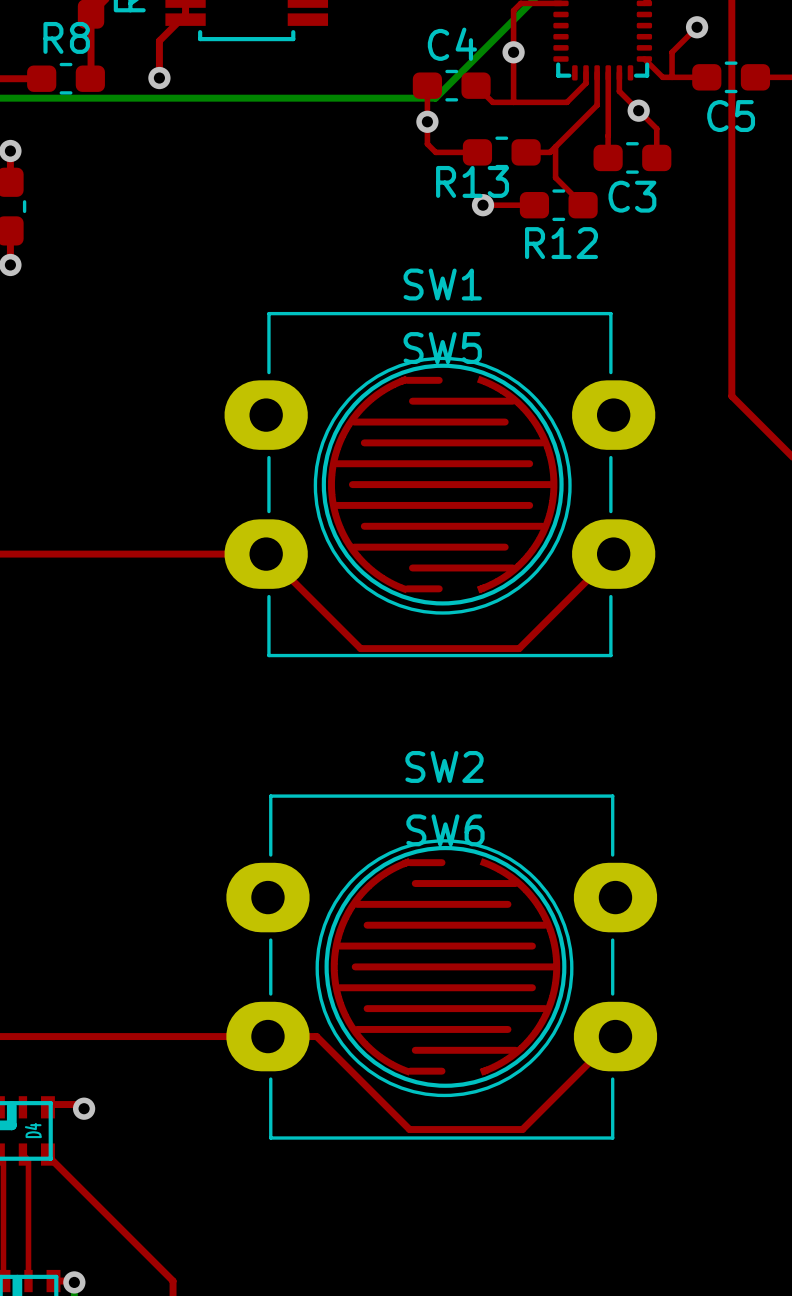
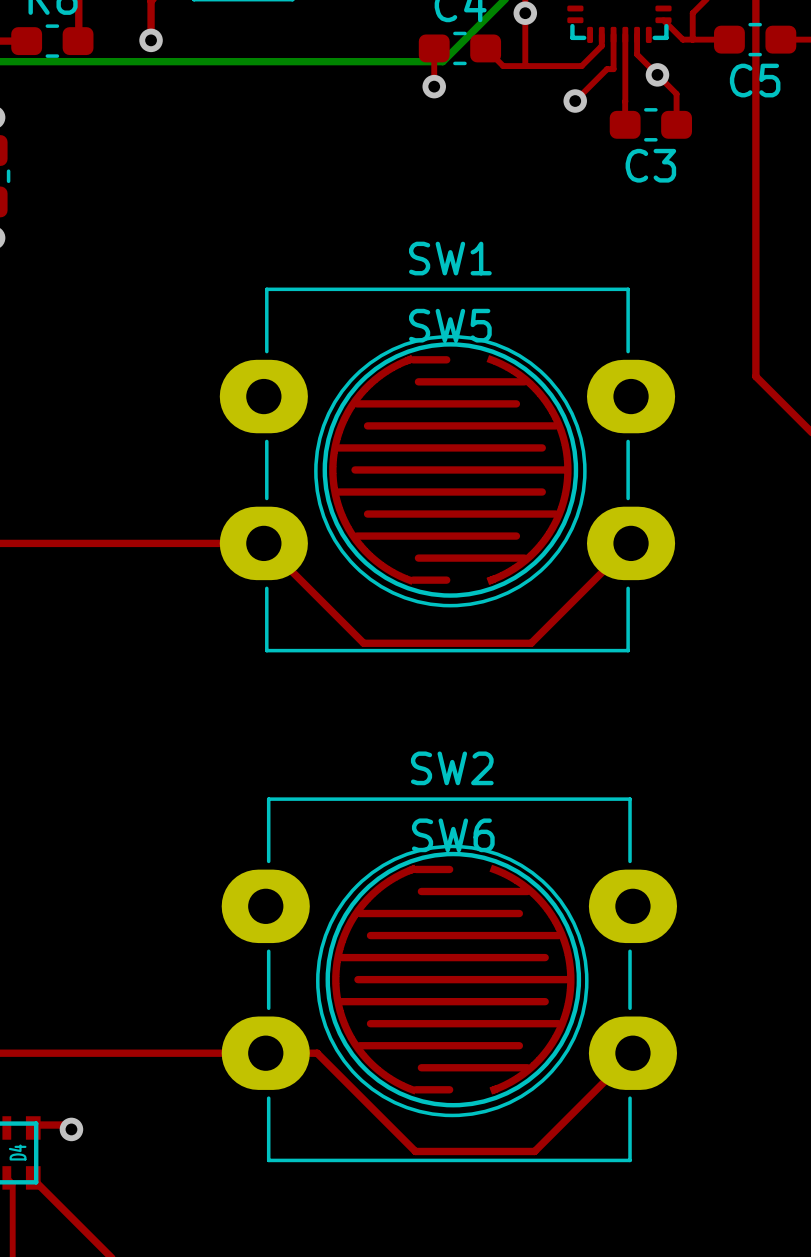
top track: (597, 105) (550, 152) (526, 152) -> (613, 69) (607, 69) (575, 101)
top track: (427, 121) (427, 144) (435, 152) (477, 152) -> none
top track: (555, 146) (555, 177) (583, 205) -> none
R13: (501, 152) -> none
top track: (483, 205) (534, 205) -> none
via position: (483, 205) -> (575, 101)
R12: (558, 205) -> none

